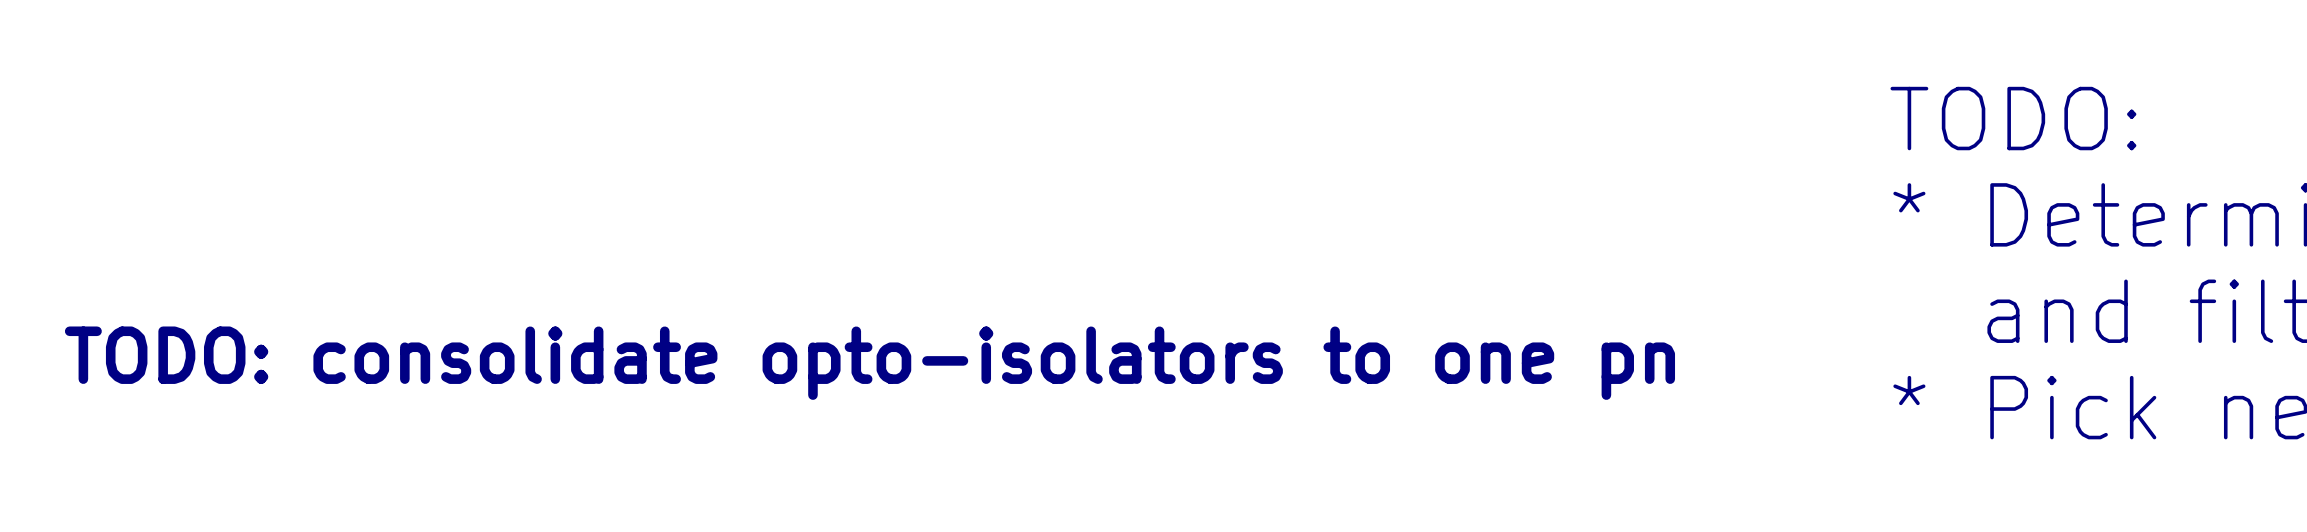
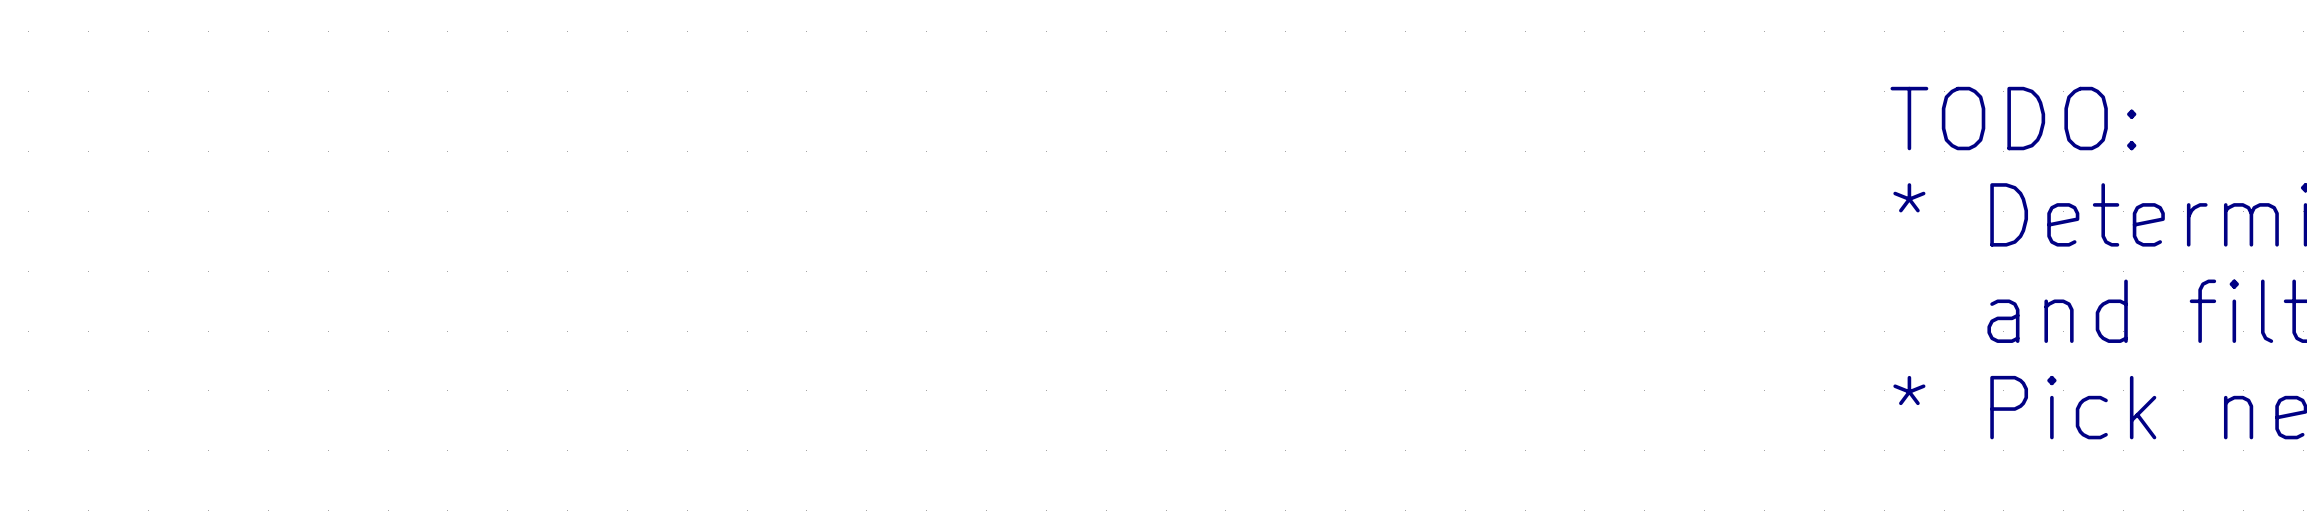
text: TODO: consolidate opto-isolators to one pn (869, 363) -> none

